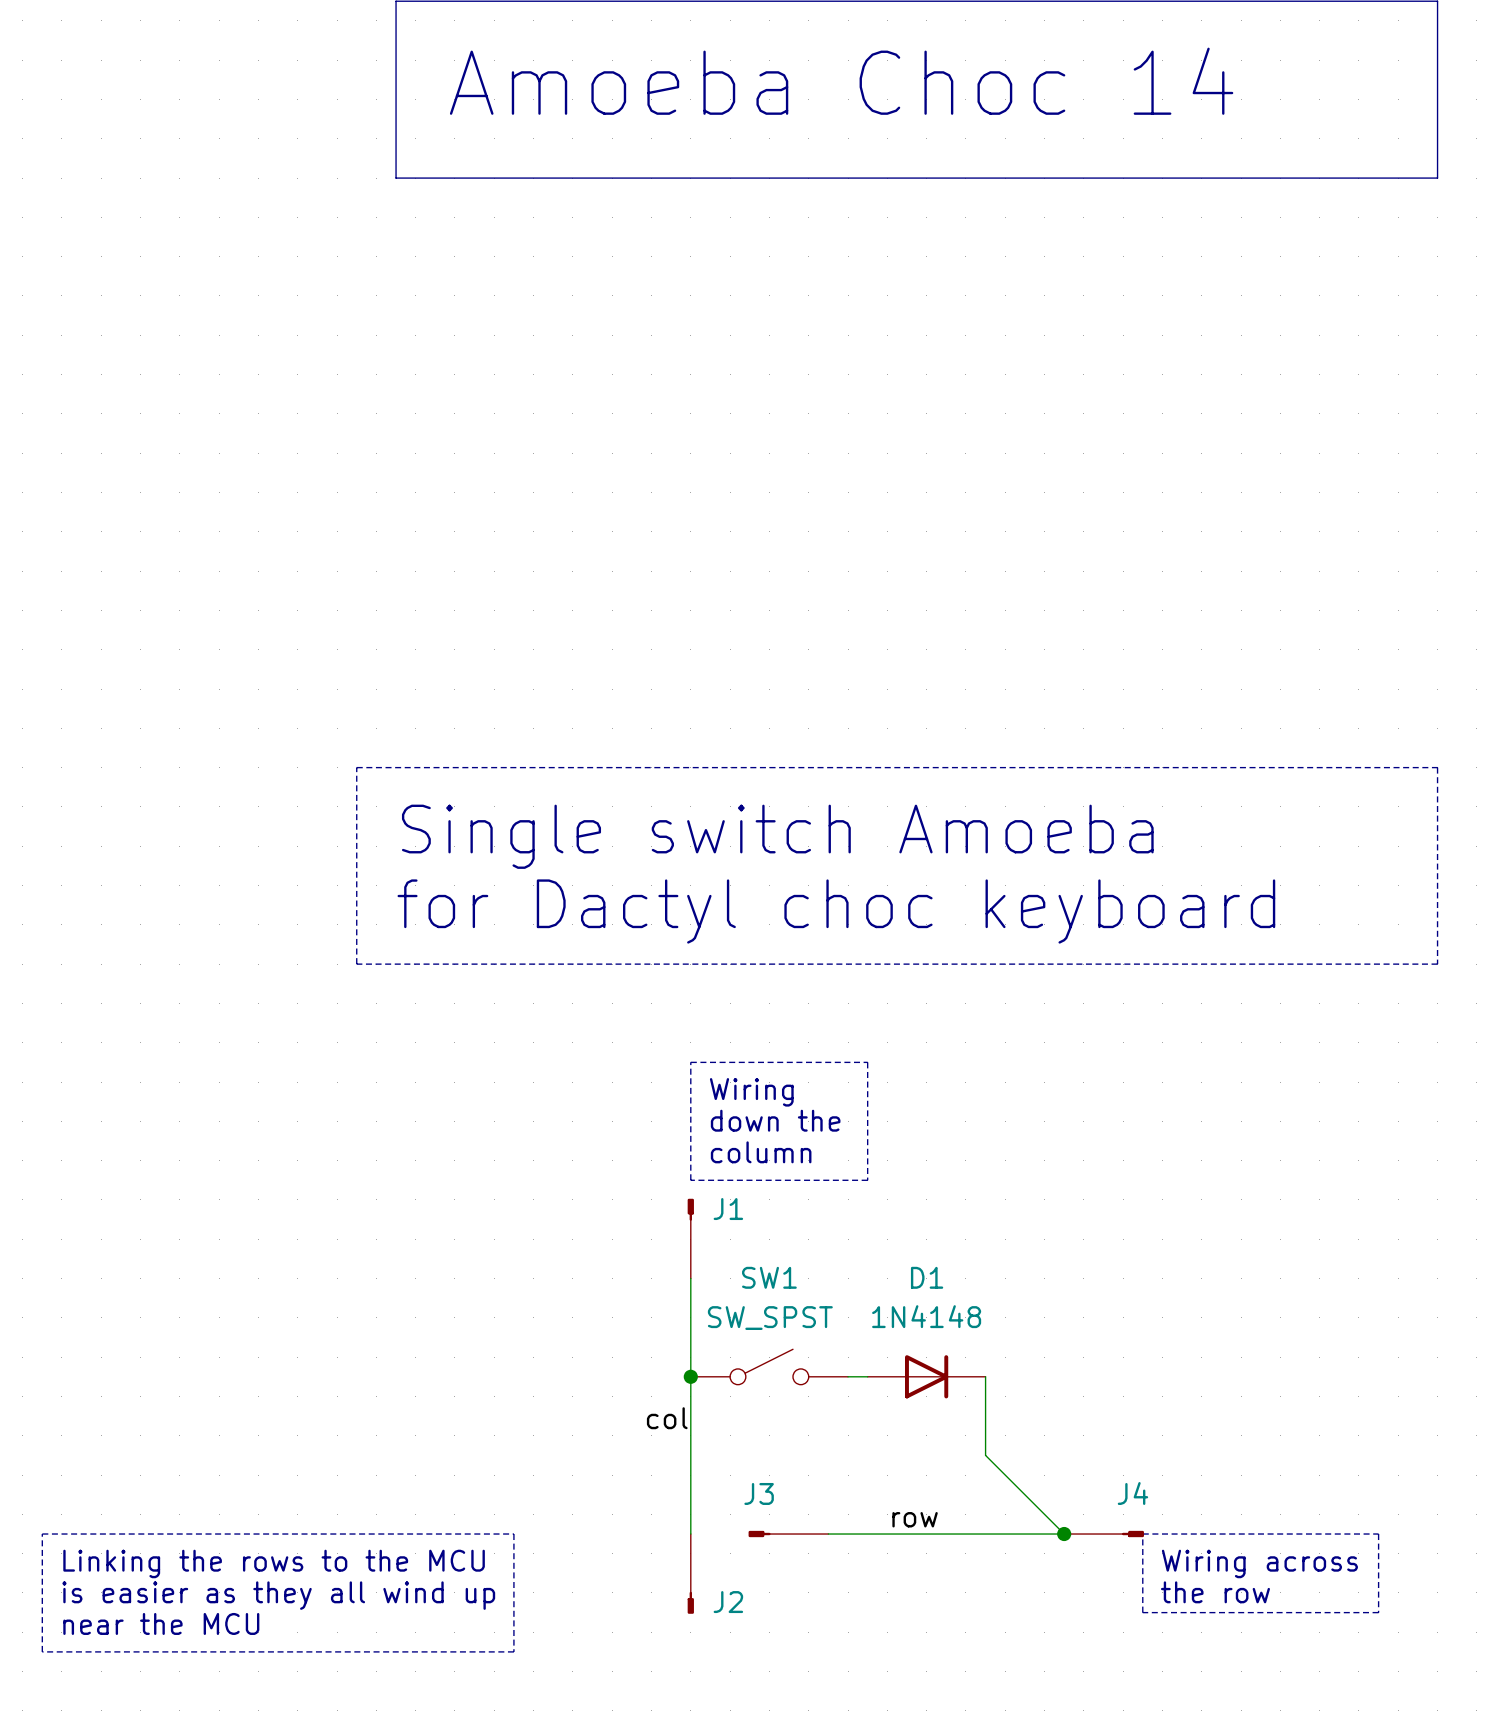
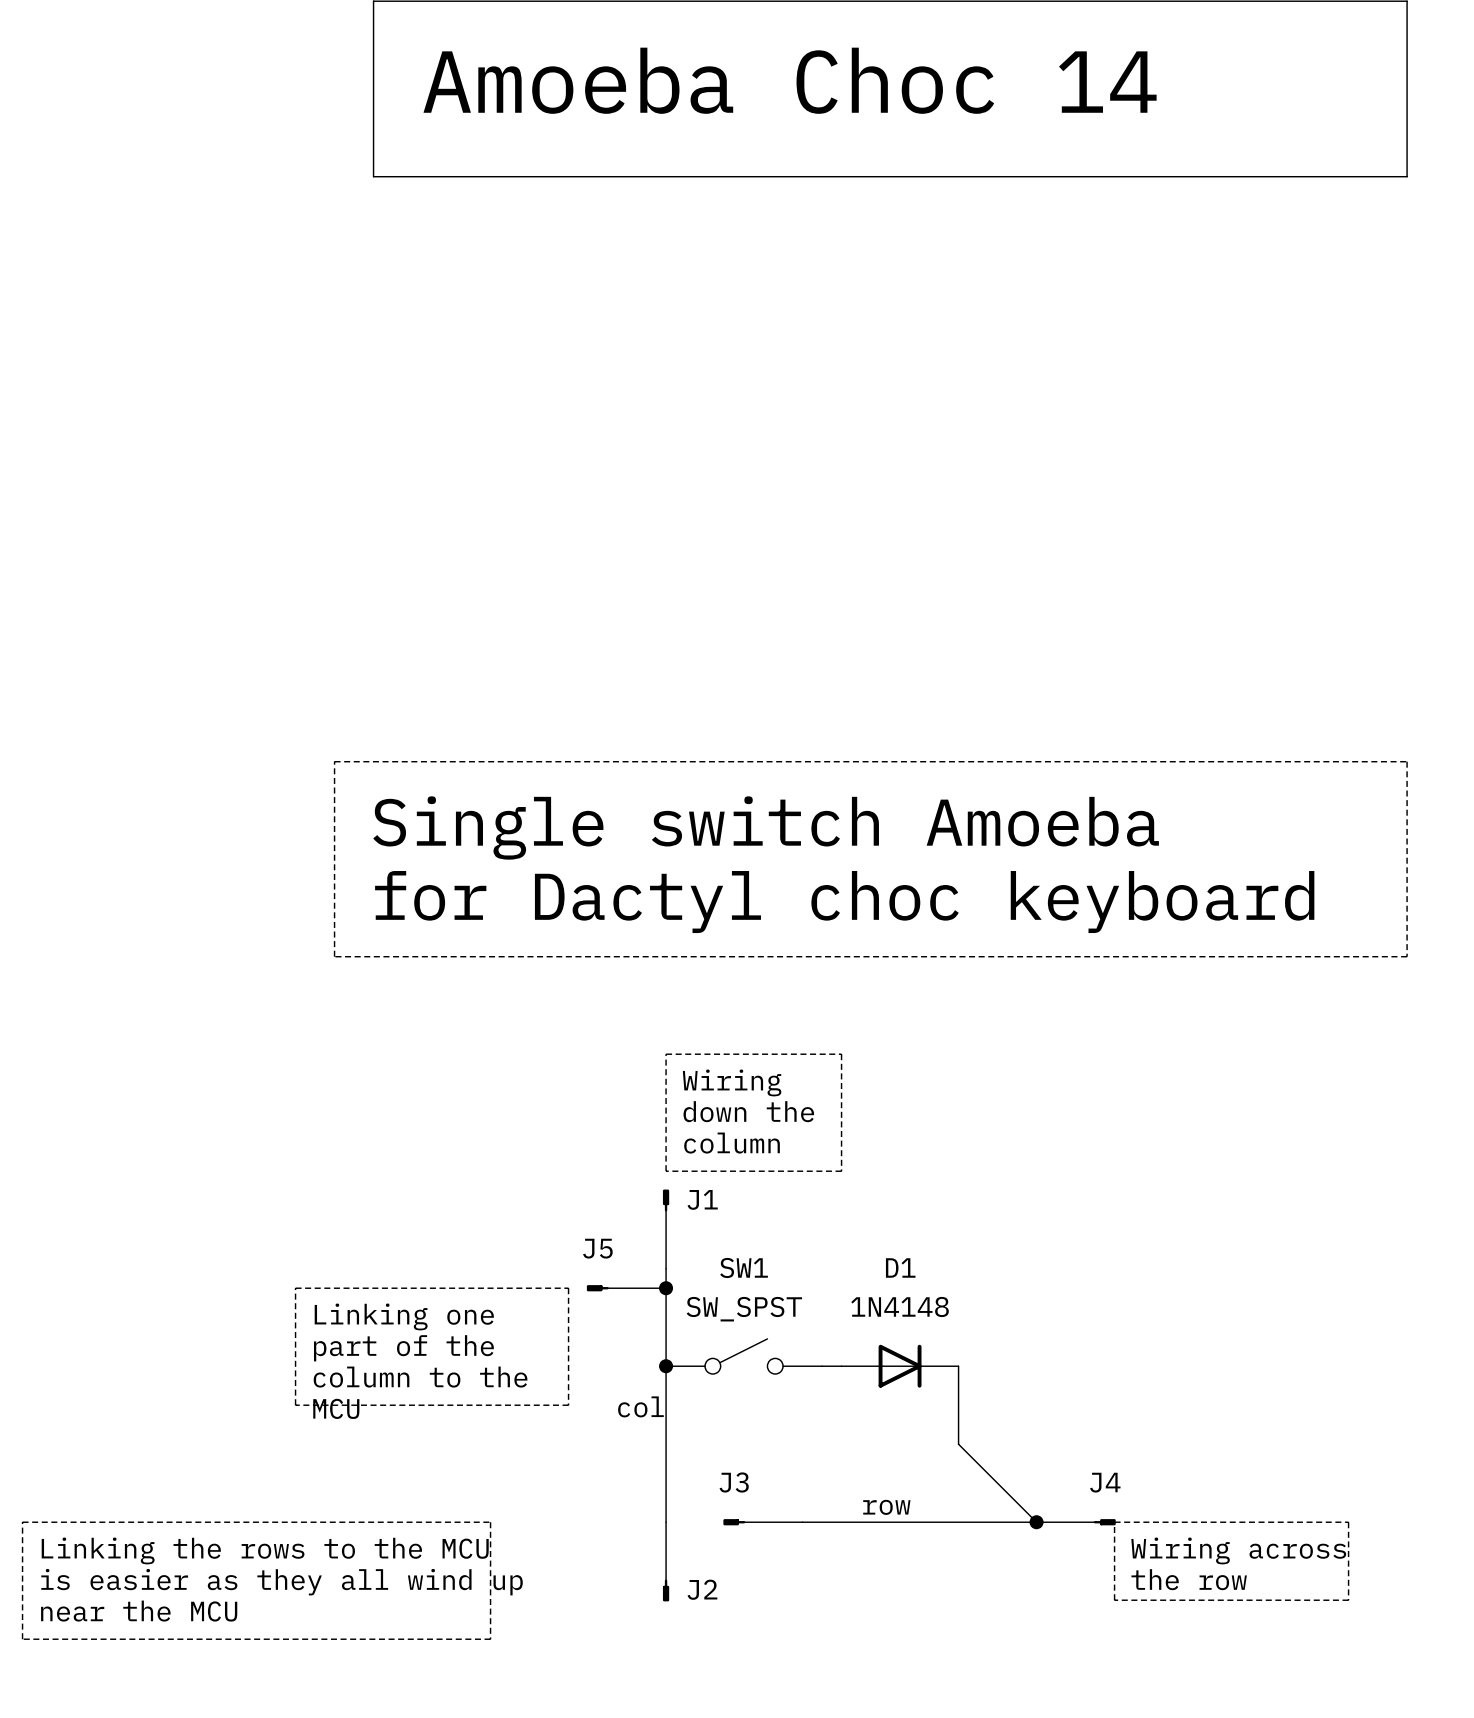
line: none -> (295, 1288) (568, 1288) (568, 1405) (295, 1405) (295, 1288)
J5: none -> (626, 1288)
junction: none -> (666, 1288)
text: none -> Linking one (404, 1316)
text: none -> part of the (403, 1348)
text: none -> column to the (420, 1377)
text: none -> MCU (336, 1408)

